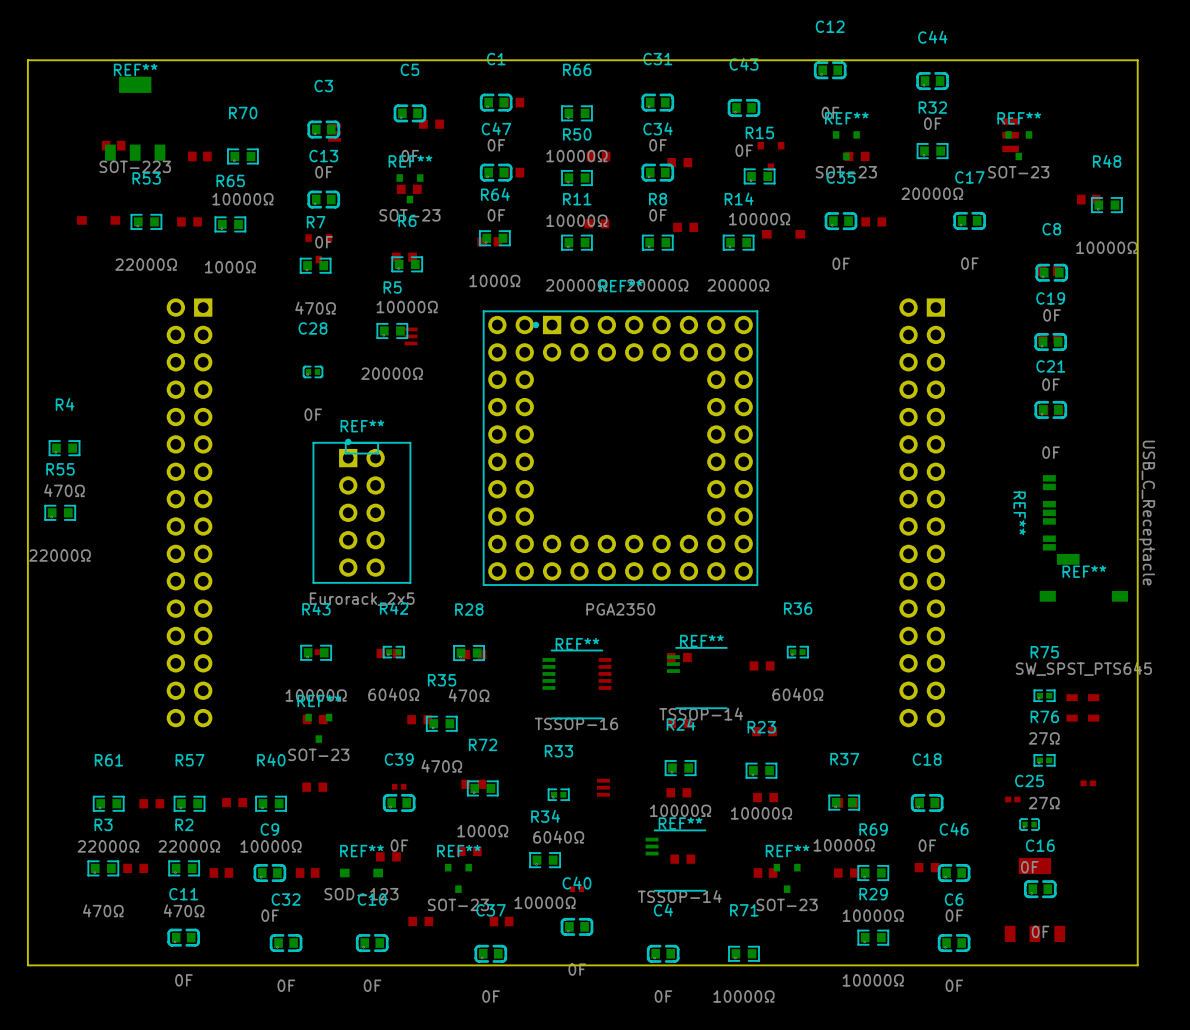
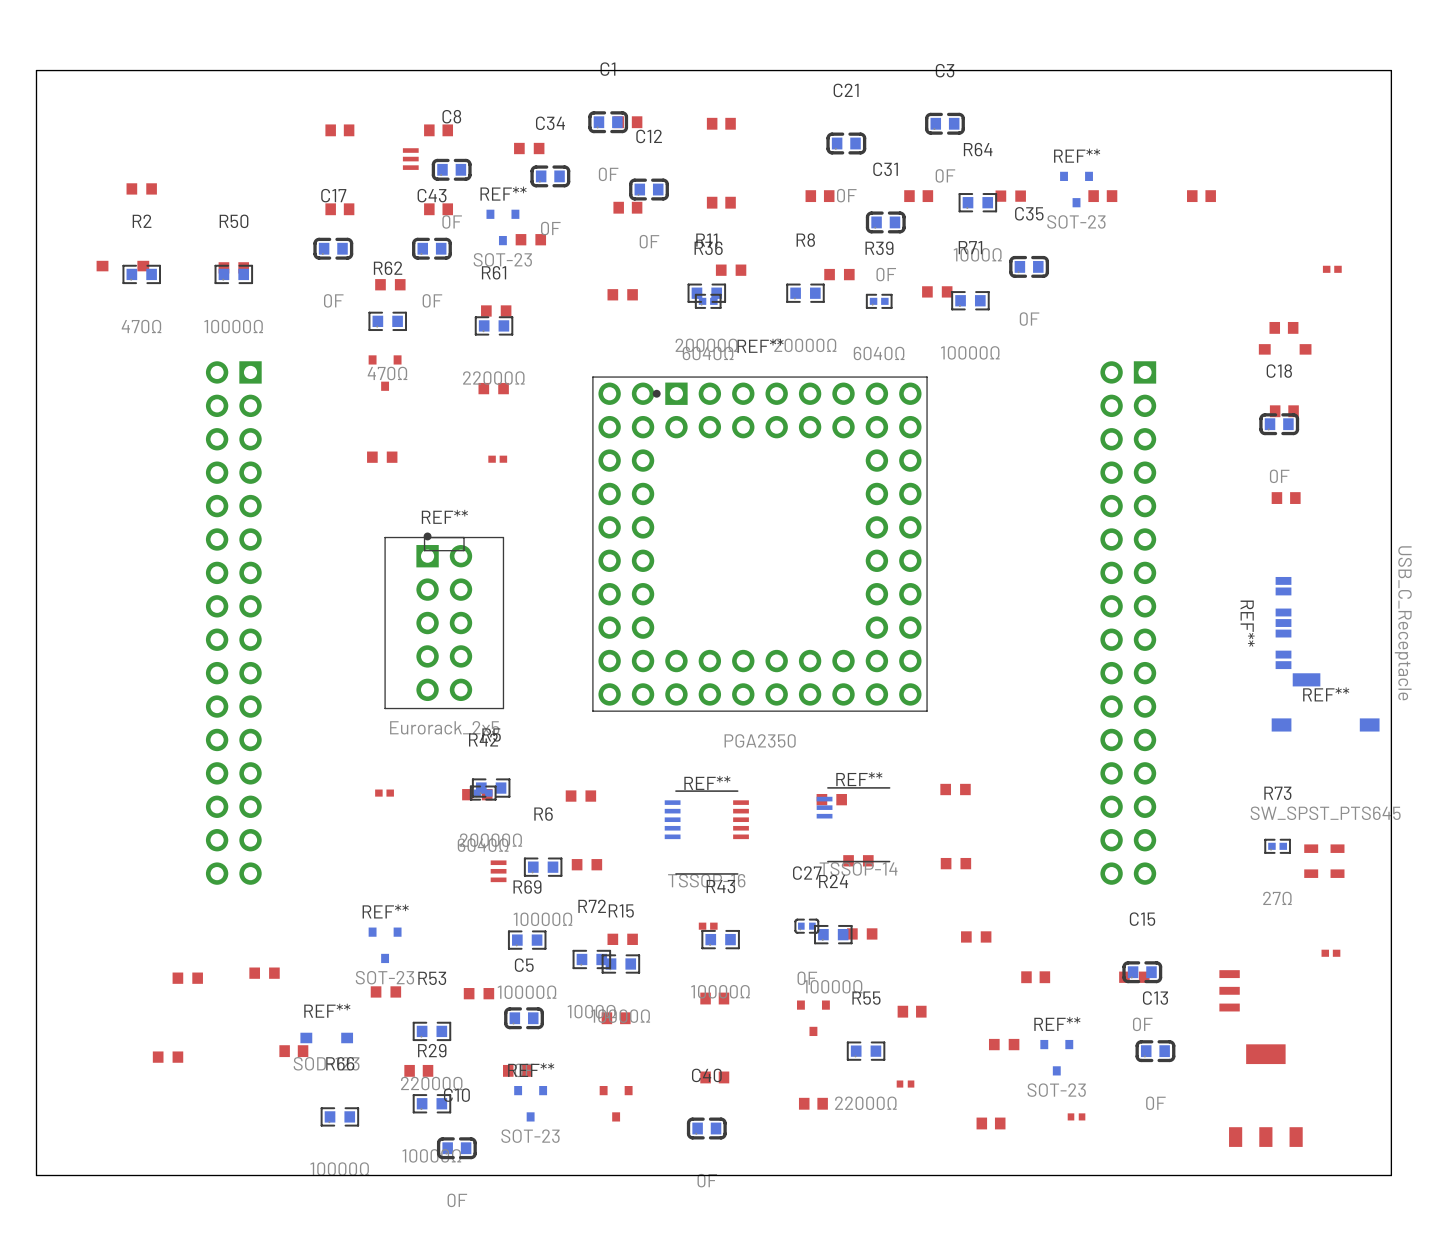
C12 position: (830, 70) -> (649, 189)
C44: 0F (932, 81) -> none
C31 position: (657, 102) -> (885, 222)
part: none -> (721, 123)
C43 position: (743, 107) -> (431, 248)
part: none -> (339, 130)
part: none -> (438, 130)
C5 position: (409, 113) -> (524, 1018)
R66 position: (576, 113) -> (339, 1116)
REF**: SOT-223 (135, 118) -> none
C3 position: (323, 129) -> (944, 123)
part: (1010, 135) -> none
part: (113, 145) -> none
REF** position: (846, 145) -> (1076, 189)
REF**: SOT-23 (1018, 145) -> none
R32: 20000Ω (932, 151) -> none
part: (199, 156) -> none
R70: 10000Ω (242, 156) -> none
part position: (598, 156) -> (721, 202)
part: (770, 156) -> none
part position: (857, 156) -> (1010, 196)
part: none -> (141, 188)
part footprint: [667, 158, 693, 168] -> [805, 190, 835, 203]
part: none -> (918, 196)
part: none -> (1102, 196)
part: none -> (1201, 196)
C47: 0F (496, 172) -> none
C34 position: (657, 172) -> (550, 176)
part: none -> (339, 209)
part: none -> (438, 209)
R15 position: (759, 176) -> (620, 964)
R50 position: (576, 178) -> (233, 274)
part position: (409, 189) -> (530, 239)
C13 position: (323, 199) -> (1155, 1051)
part: (1088, 199) -> none
R48: 10000Ω (1106, 205) -> none
C17 position: (969, 220) -> (333, 248)
R53 position: (146, 221) -> (431, 1031)
part: (873, 221) -> none
R7 name: R7 (316, 222) -> R62 (388, 268)
part: none -> (1332, 269)
R65: 1000Ω (230, 224) -> none
part: (783, 234) -> none
part: none -> (390, 284)
R64 position: (494, 238) -> (977, 202)
part position: (489, 241) -> (622, 294)
part: none -> (937, 291)
R14: 20000Ω (738, 242) -> none
part position: (318, 248) -> (385, 373)
R39: none -> 6040Ω (879, 301)
R6 position: (407, 264) -> (543, 867)
C8 position: (1051, 272) -> (451, 169)
part: none -> (1285, 349)
part: none -> (493, 388)
R5 position: (392, 330) -> (491, 788)
part: (411, 336) -> none
C19: 0F (1050, 341) -> none
C28: 0F (312, 371) -> none
part: none -> (382, 457)
part: none -> (497, 459)
C21 position: (1050, 409) -> (846, 143)
R4: 470Ω (64, 448) -> none
R55 position: (60, 512) -> (866, 1051)
part: none -> (955, 789)
R43 position: (316, 652) -> (720, 939)
R36 position: (797, 652) -> (708, 301)
R75 name: R75 (1044, 652) -> R73 (1277, 793)
R28: 470Ω (469, 653) -> none
part: (762, 665) -> none
part: none -> (858, 860)
part: none -> (955, 863)
part: none -> (586, 864)
part: none -> (498, 871)
part: (315, 719) -> none
part: (419, 719) -> none
R35: 470Ω (441, 723) -> none
part: (679, 723) -> none
REF** position: (318, 728) -> (385, 945)
part: (764, 731) -> none
R76: 27Ω (1044, 760) -> none
part: none -> (708, 926)
C27: none -> 0F (806, 926)
part: none -> (862, 933)
part: none -> (976, 936)
R23: 10000Ω (761, 770) -> none
part position: (473, 784) -> (622, 939)
part: (399, 786) -> none
part position: (314, 787) -> (385, 991)
part: (603, 787) -> none
part: (678, 792) -> none
R33: 6040Ω (558, 794) -> none
part: (765, 797) -> none
C15: none -> 0F (1142, 972)
part: (1012, 799) -> none
part position: (234, 802) -> (264, 973)
C39: 0F (399, 802) -> none
R37: 10000Ω (844, 802) -> none
C18 position: (927, 802) -> (1279, 424)
R61 position: (108, 803) -> (494, 325)
R57: 22000Ω (189, 803) -> none
R40: 10000Ω (271, 803) -> none
part: none -> (1229, 990)
part: none -> (478, 993)
part: none -> (714, 998)
C25: 0F (1029, 824) -> none
part: none -> (912, 1011)
part: none -> (616, 1018)
part: none -> (813, 1018)
part: (469, 851) -> none
part: (388, 856) -> none
part: (682, 859) -> none
R34: 10000Ω (545, 860) -> none
REF**: TSSOP-14 (675, 860) -> none
part: (927, 867) -> none
R3: 470Ω (103, 868) -> none
R2 position: (184, 868) -> (141, 274)
part position: (221, 873) -> (293, 1051)
C9: 0F (269, 873) -> none
part position: (307, 873) -> (418, 1070)
REF** position: (361, 873) -> (326, 1037)
part: (765, 873) -> none
part position: (846, 873) -> (1004, 1044)
R69 position: (873, 873) -> (527, 940)
C46: 0F (954, 873) -> none
REF** position: (458, 878) -> (530, 1103)
REF** position: (787, 878) -> (1056, 1057)
part: none -> (517, 1070)
part footprint: [569, 886, 585, 893] -> [700, 1071, 730, 1084]
C16: 0F (1040, 889) -> none
part: none -> (905, 1084)
part: none -> (616, 1103)
part: none -> (813, 1103)
part: none -> (1076, 1116)
part: (420, 921) -> none
part: (501, 921) -> none
part: none -> (991, 1123)
C11: 0F (183, 937) -> none
R29 position: (873, 937) -> (431, 1103)
C32: 0F (286, 943) -> none
C6: 0F (954, 943) -> none
C37: 0F (490, 953) -> none
C4: 0F (663, 953) -> none
R71 position: (743, 953) -> (970, 300)

